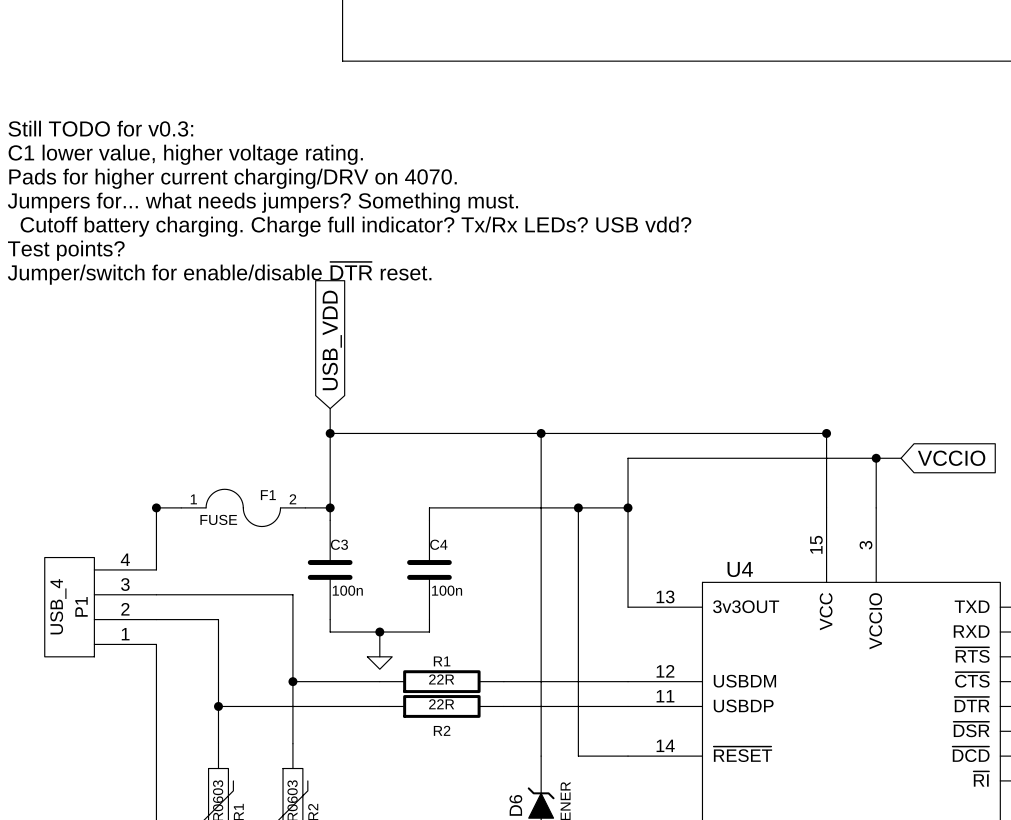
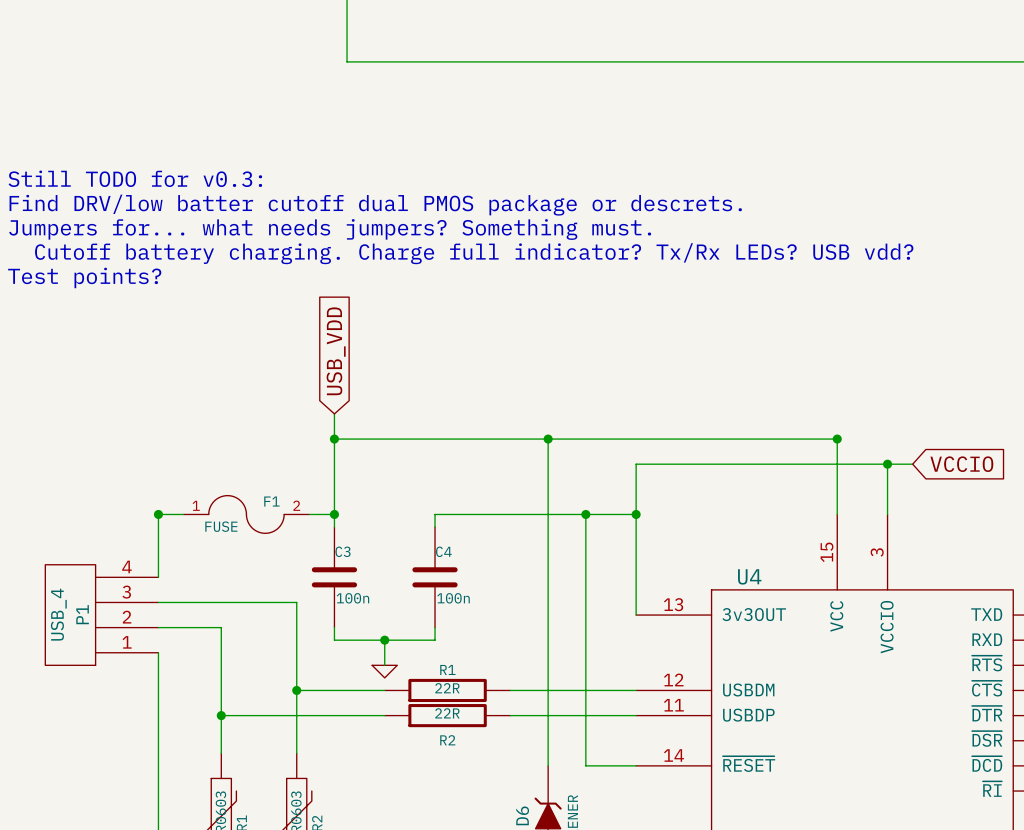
text: Still TODO for v0.3: (100, 128) -> none
text: C1 lower value, higher voltage rating. (185, 154) -> none
text: Pads for higher current charging/DRV on 4070. (233, 178) -> Still TODO for v0.3: (135, 178)
text: Jumpers for... what needs jumpers? Something must. (262, 202) -> Find DRV/low batter cutoff dual PMOS package or descrets. (375, 205)
text: Cutoff battery charging. Charge full indicator? Tx/Rx LEDs? USB vdd? (355, 226) -> Jumpers for... what needs jumpers? Something must. (330, 229)
text: Test points? (66, 250) -> Cutoff battery charging. Charge full indicator? Tx/Rx LEDs? USB vdd? (474, 253)
text: Jumper/switch for enable/disable ~{DTR} reset. (219, 273) -> Test points? (84, 277)

